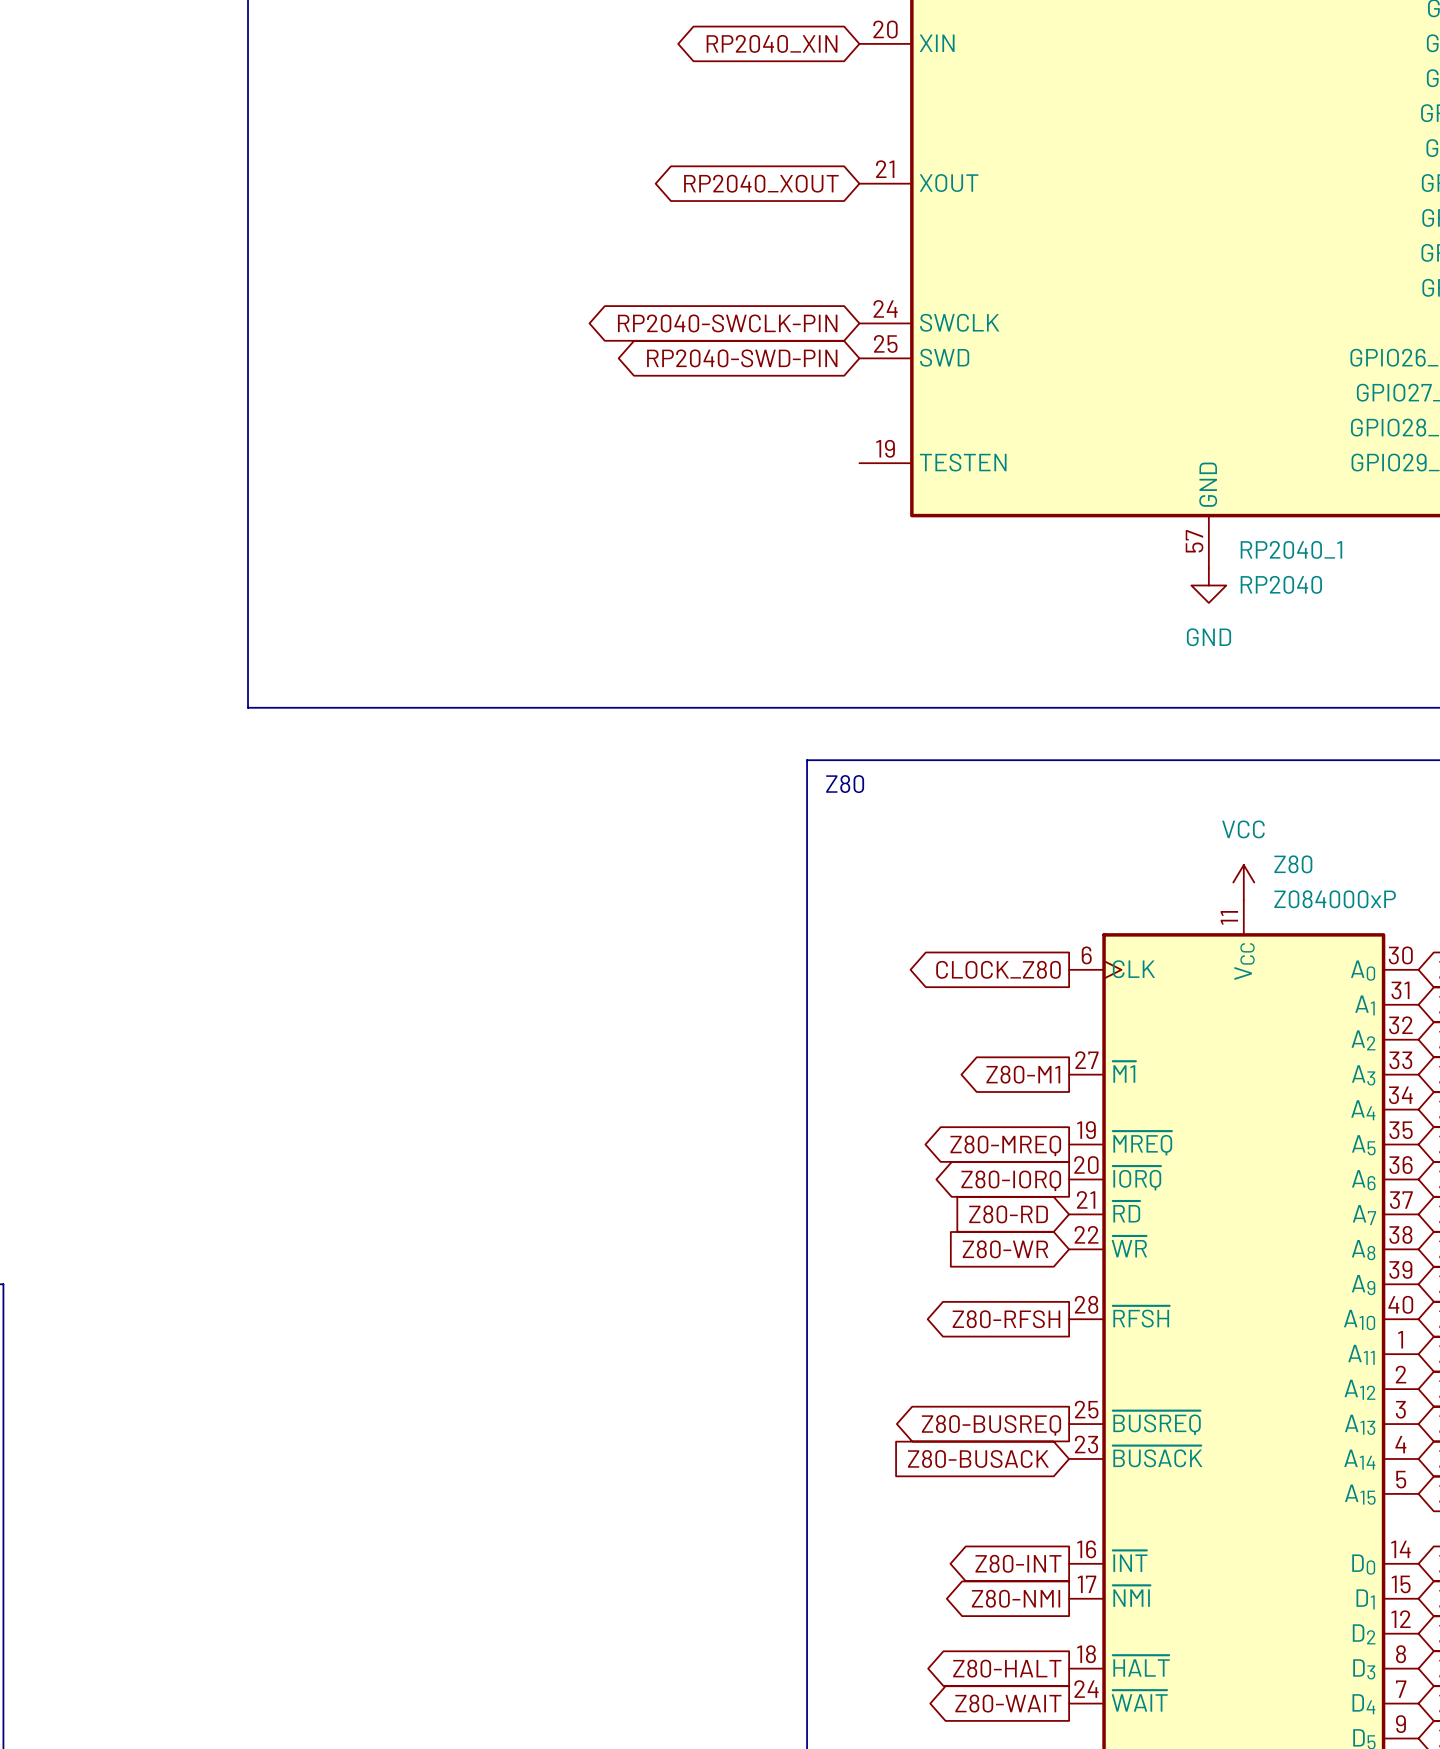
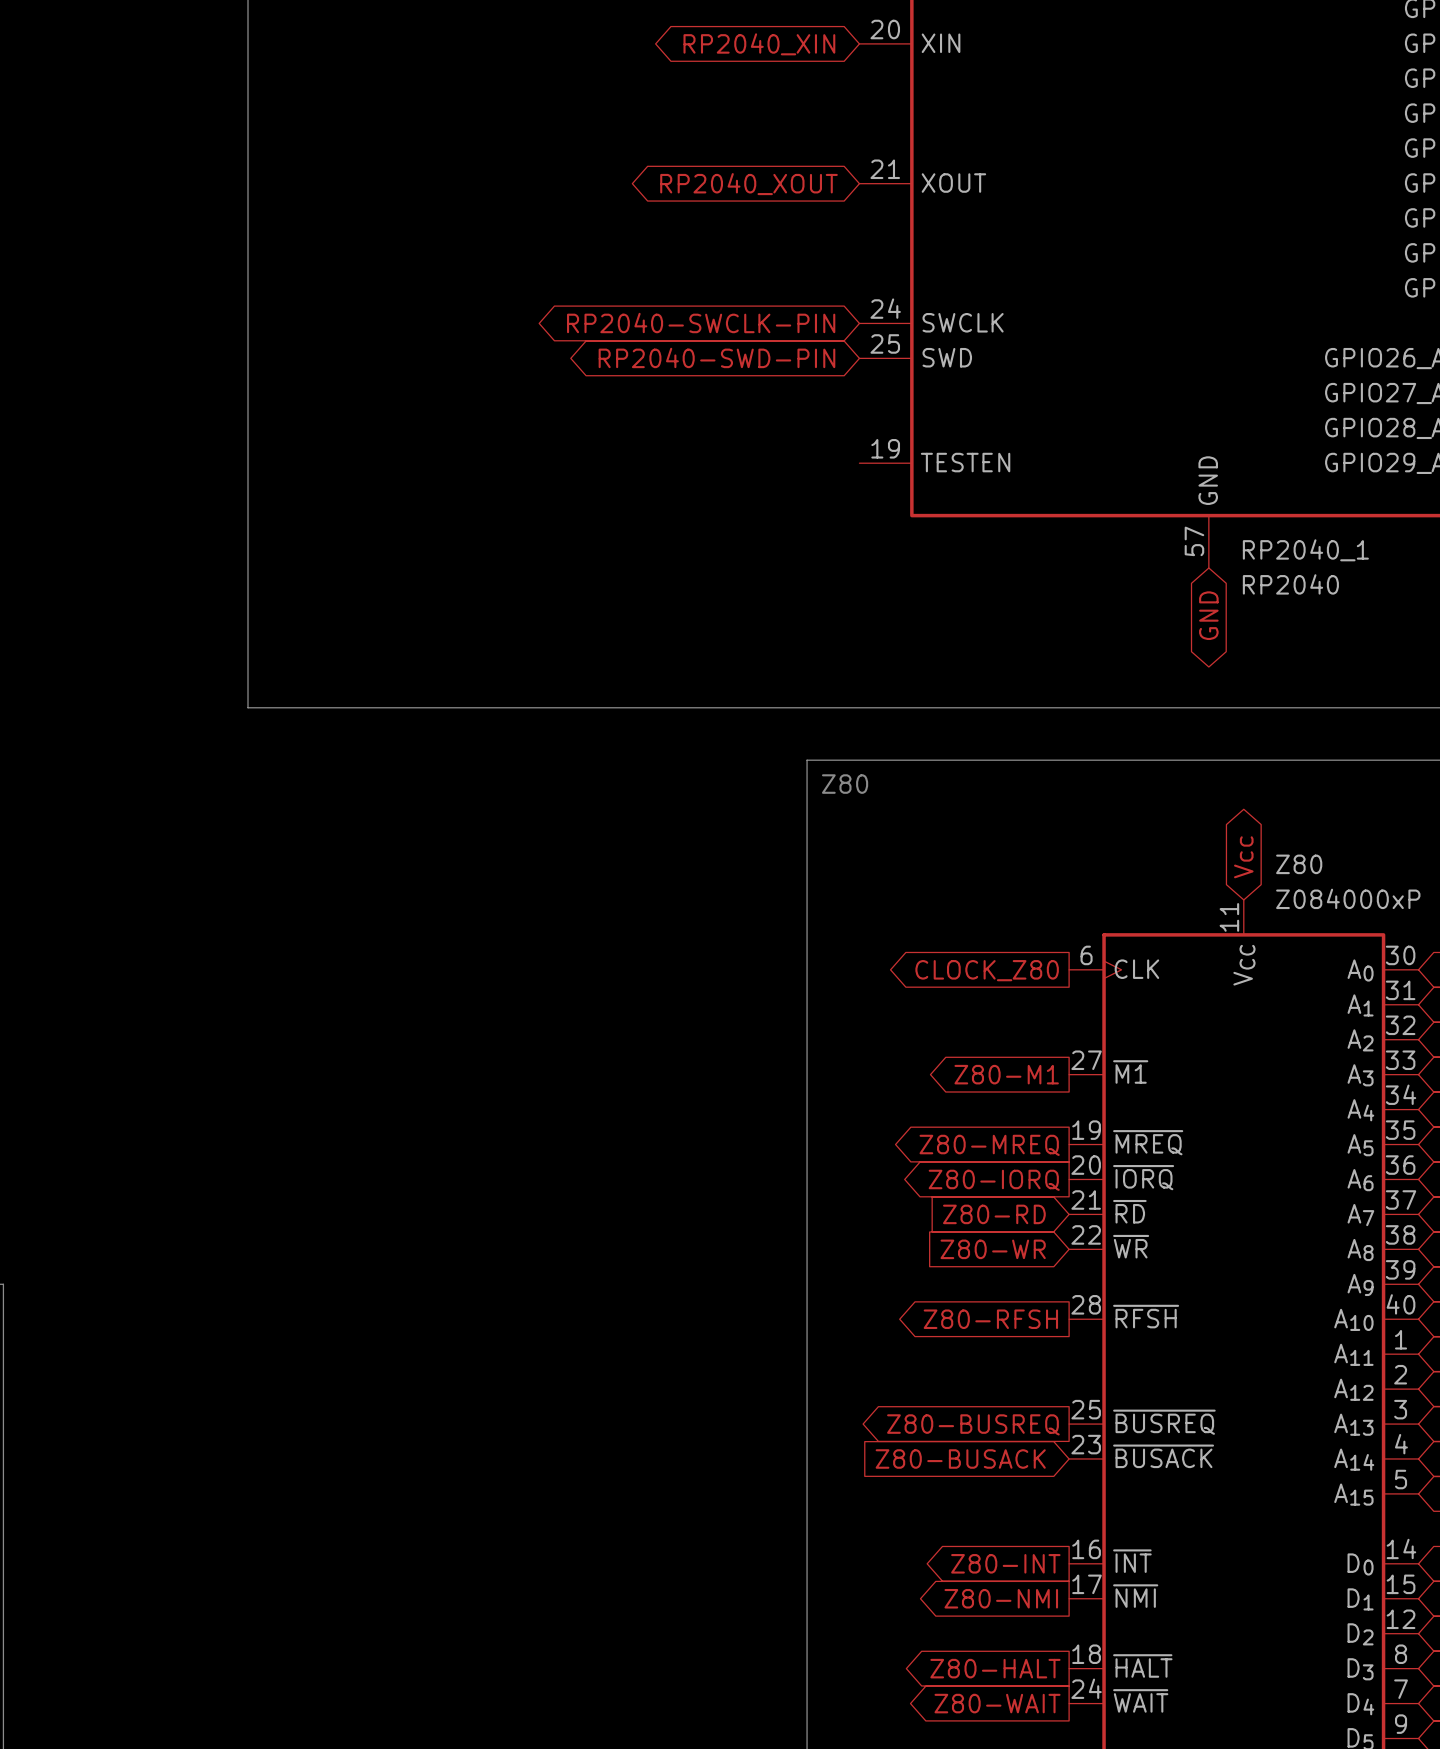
power symbol: GND (1208, 585) -> none
global label: none -> GND (1208, 615)
global label: none -> Vcc (1243, 857)
power symbol: VCC (1243, 882) -> none

